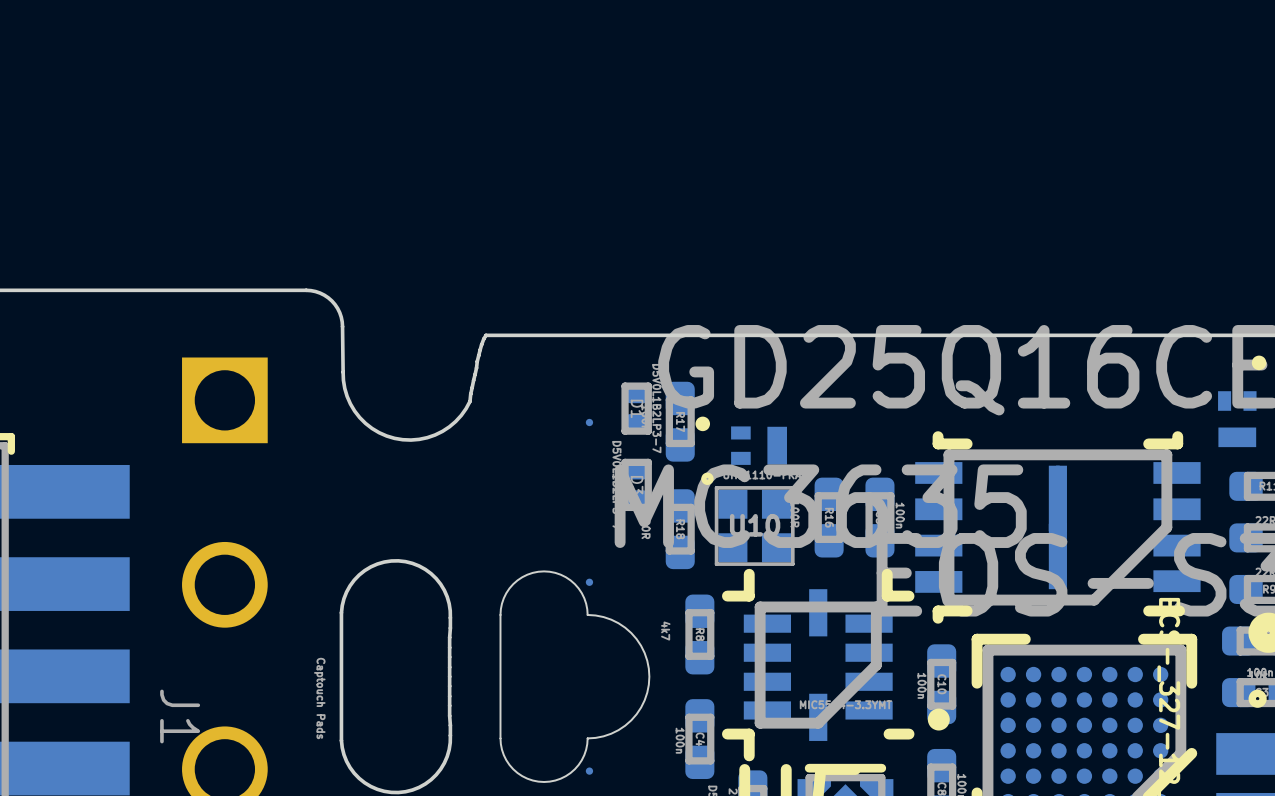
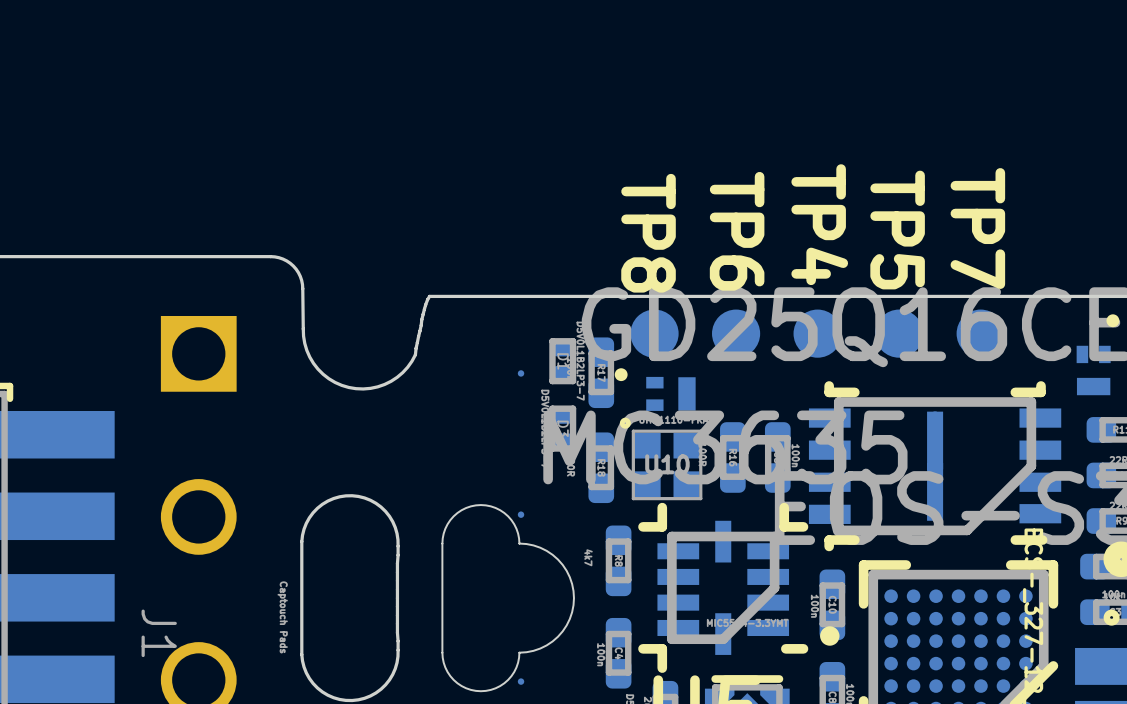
TP8: none -> (654, 333)
TP6: none -> (736, 333)
TP4: none -> (817, 333)
TP5: none -> (899, 333)
TP7: none -> (980, 333)

